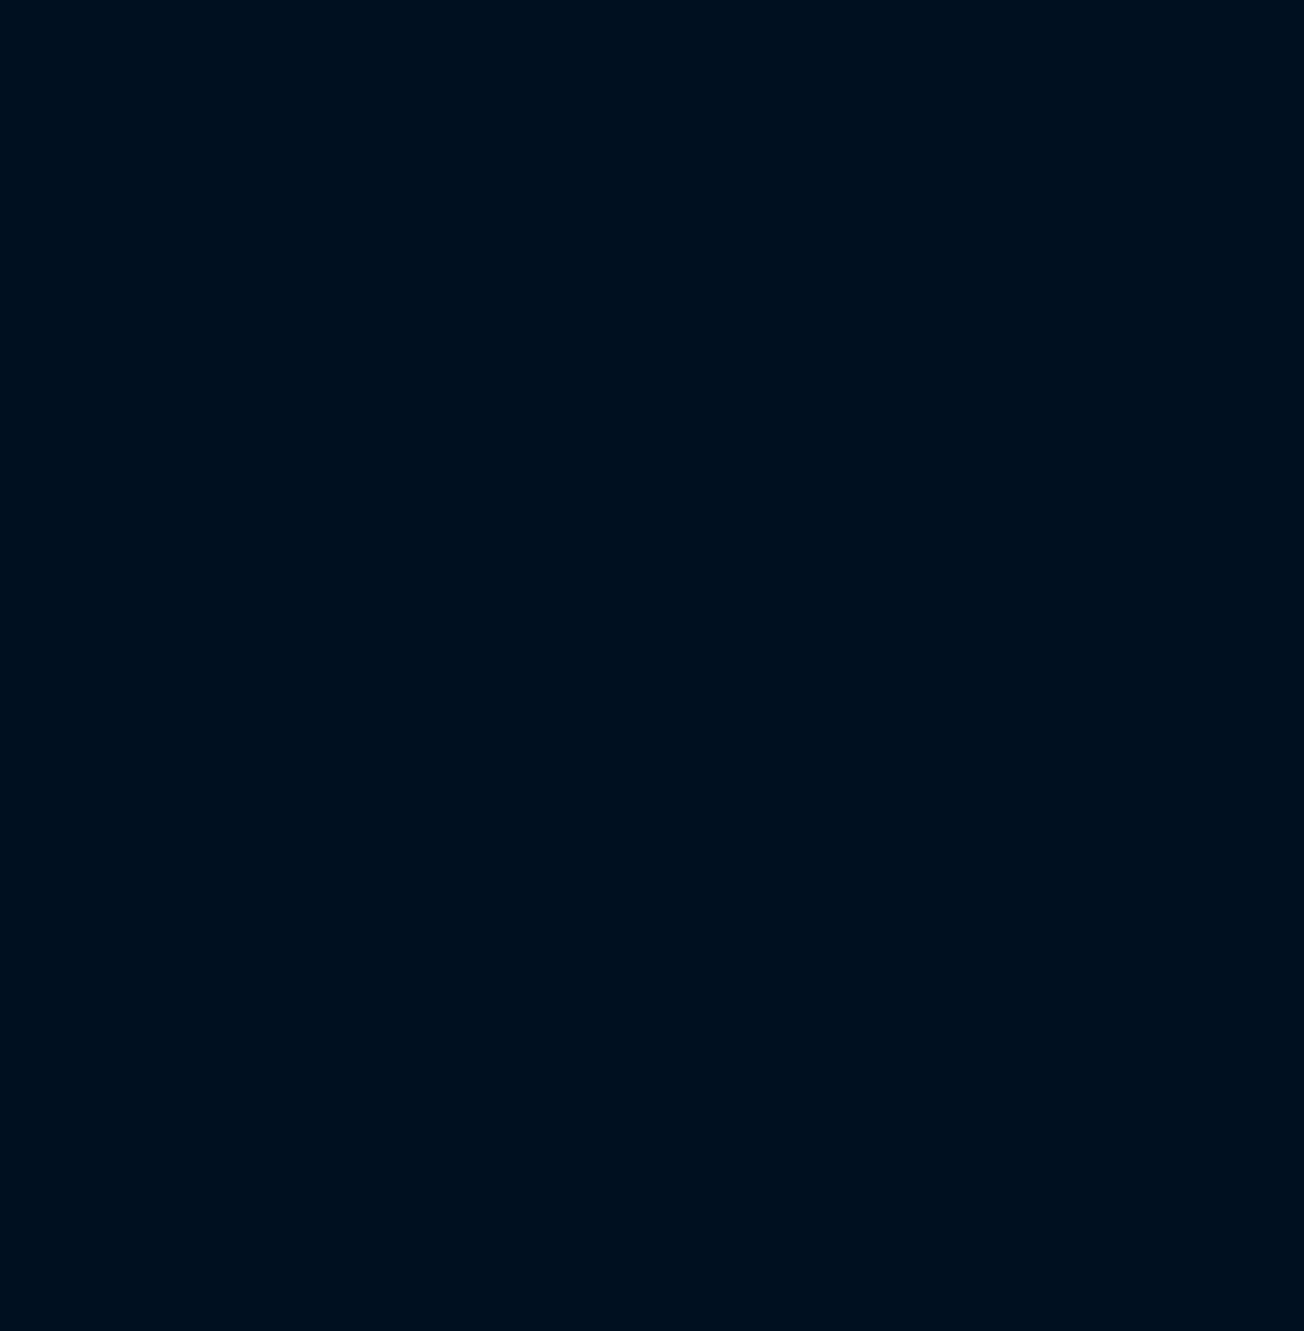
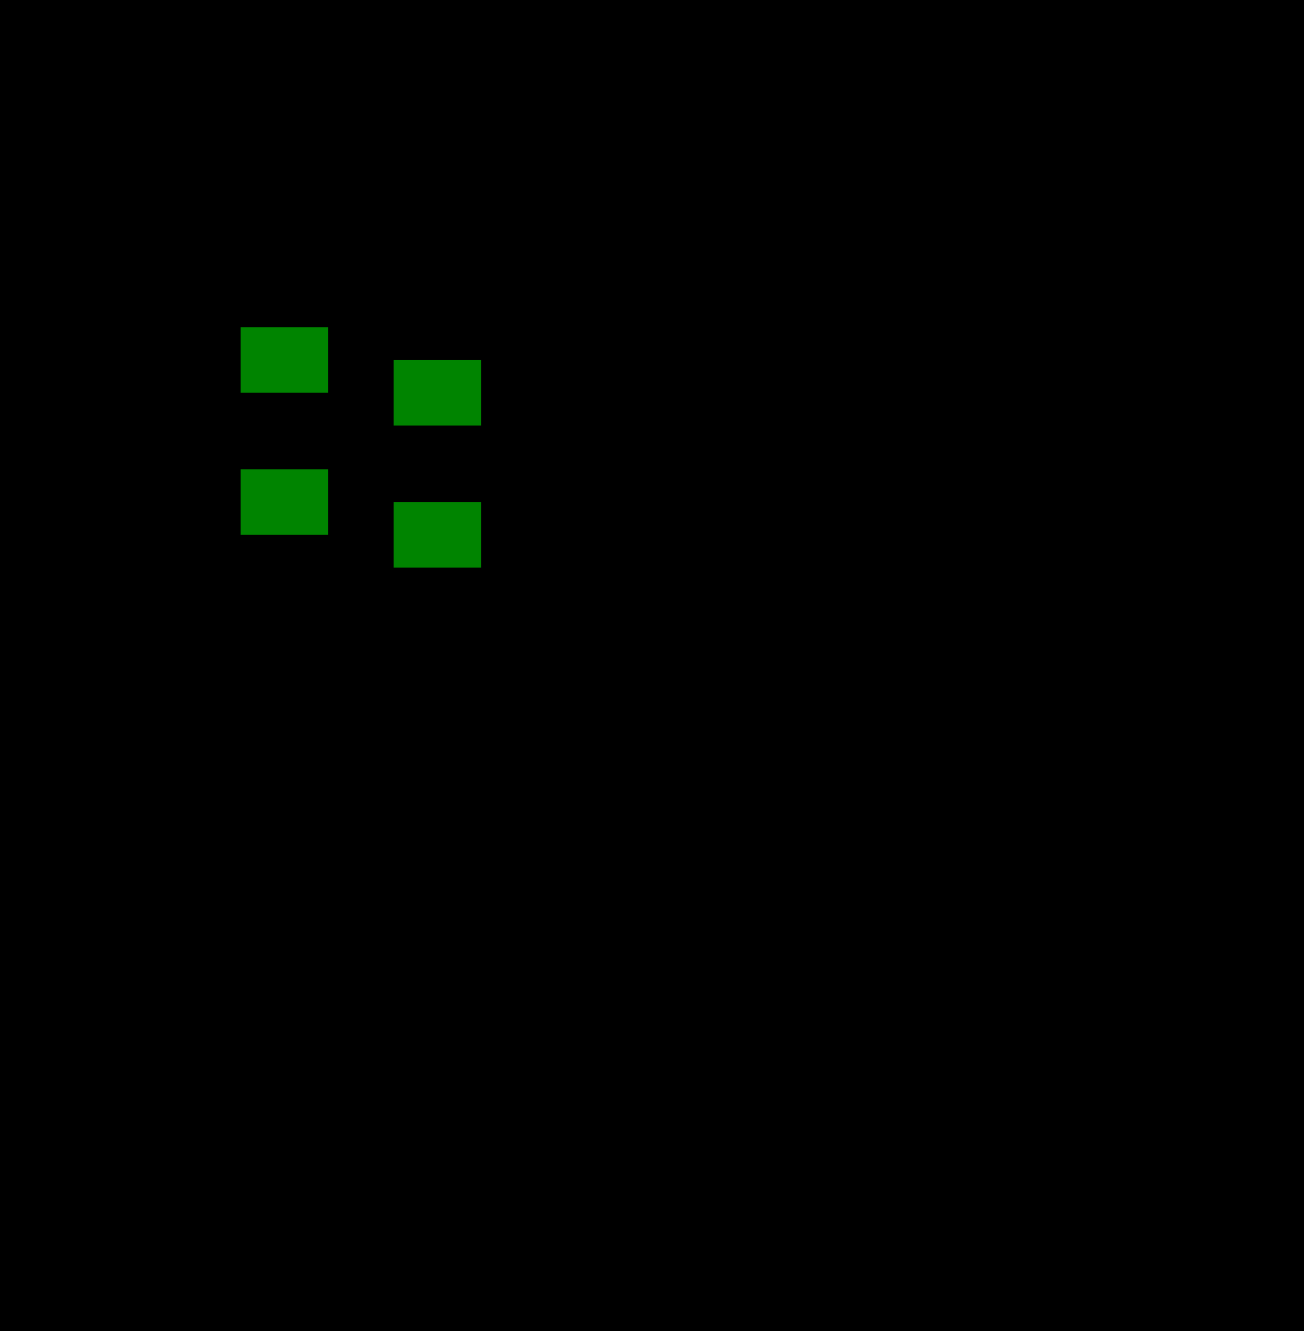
part: none -> (284, 431)
part: none -> (437, 463)

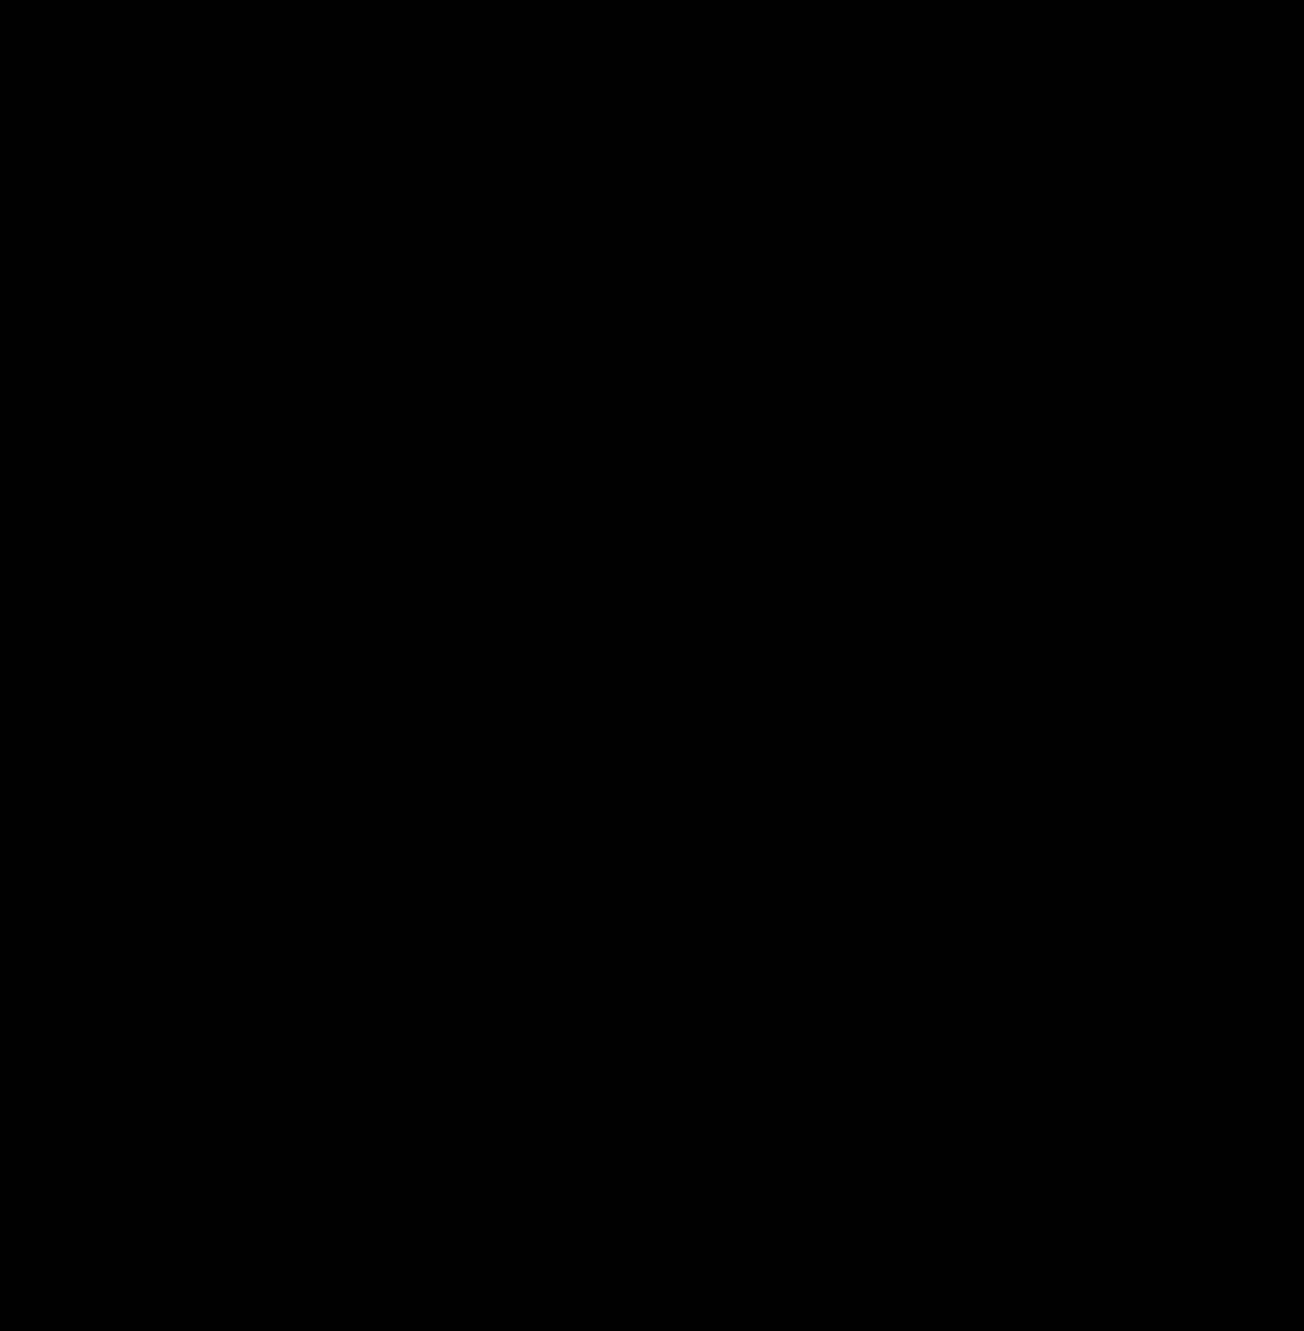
part: (284, 431) -> none
part: (437, 463) -> none

